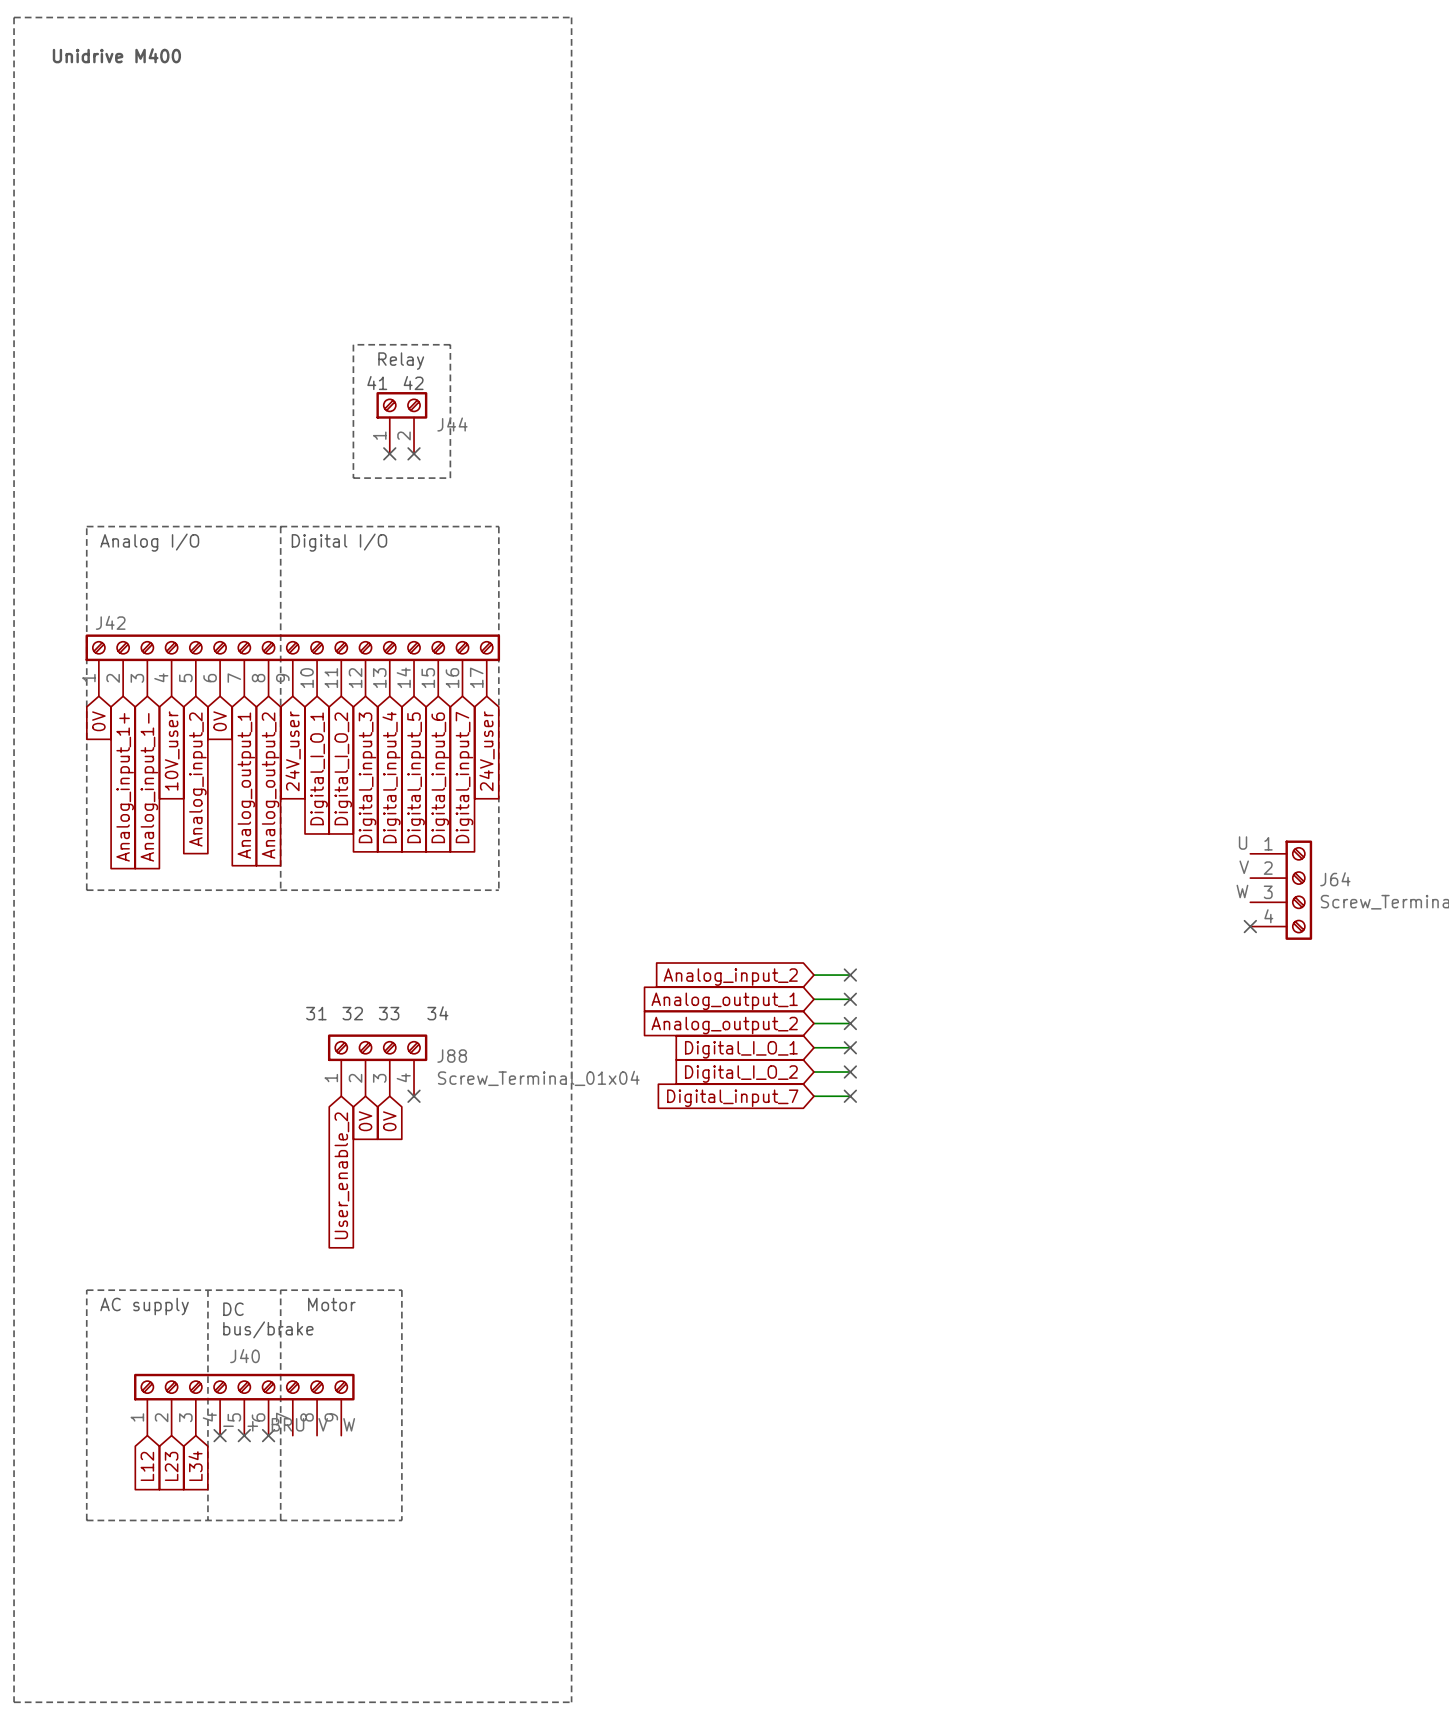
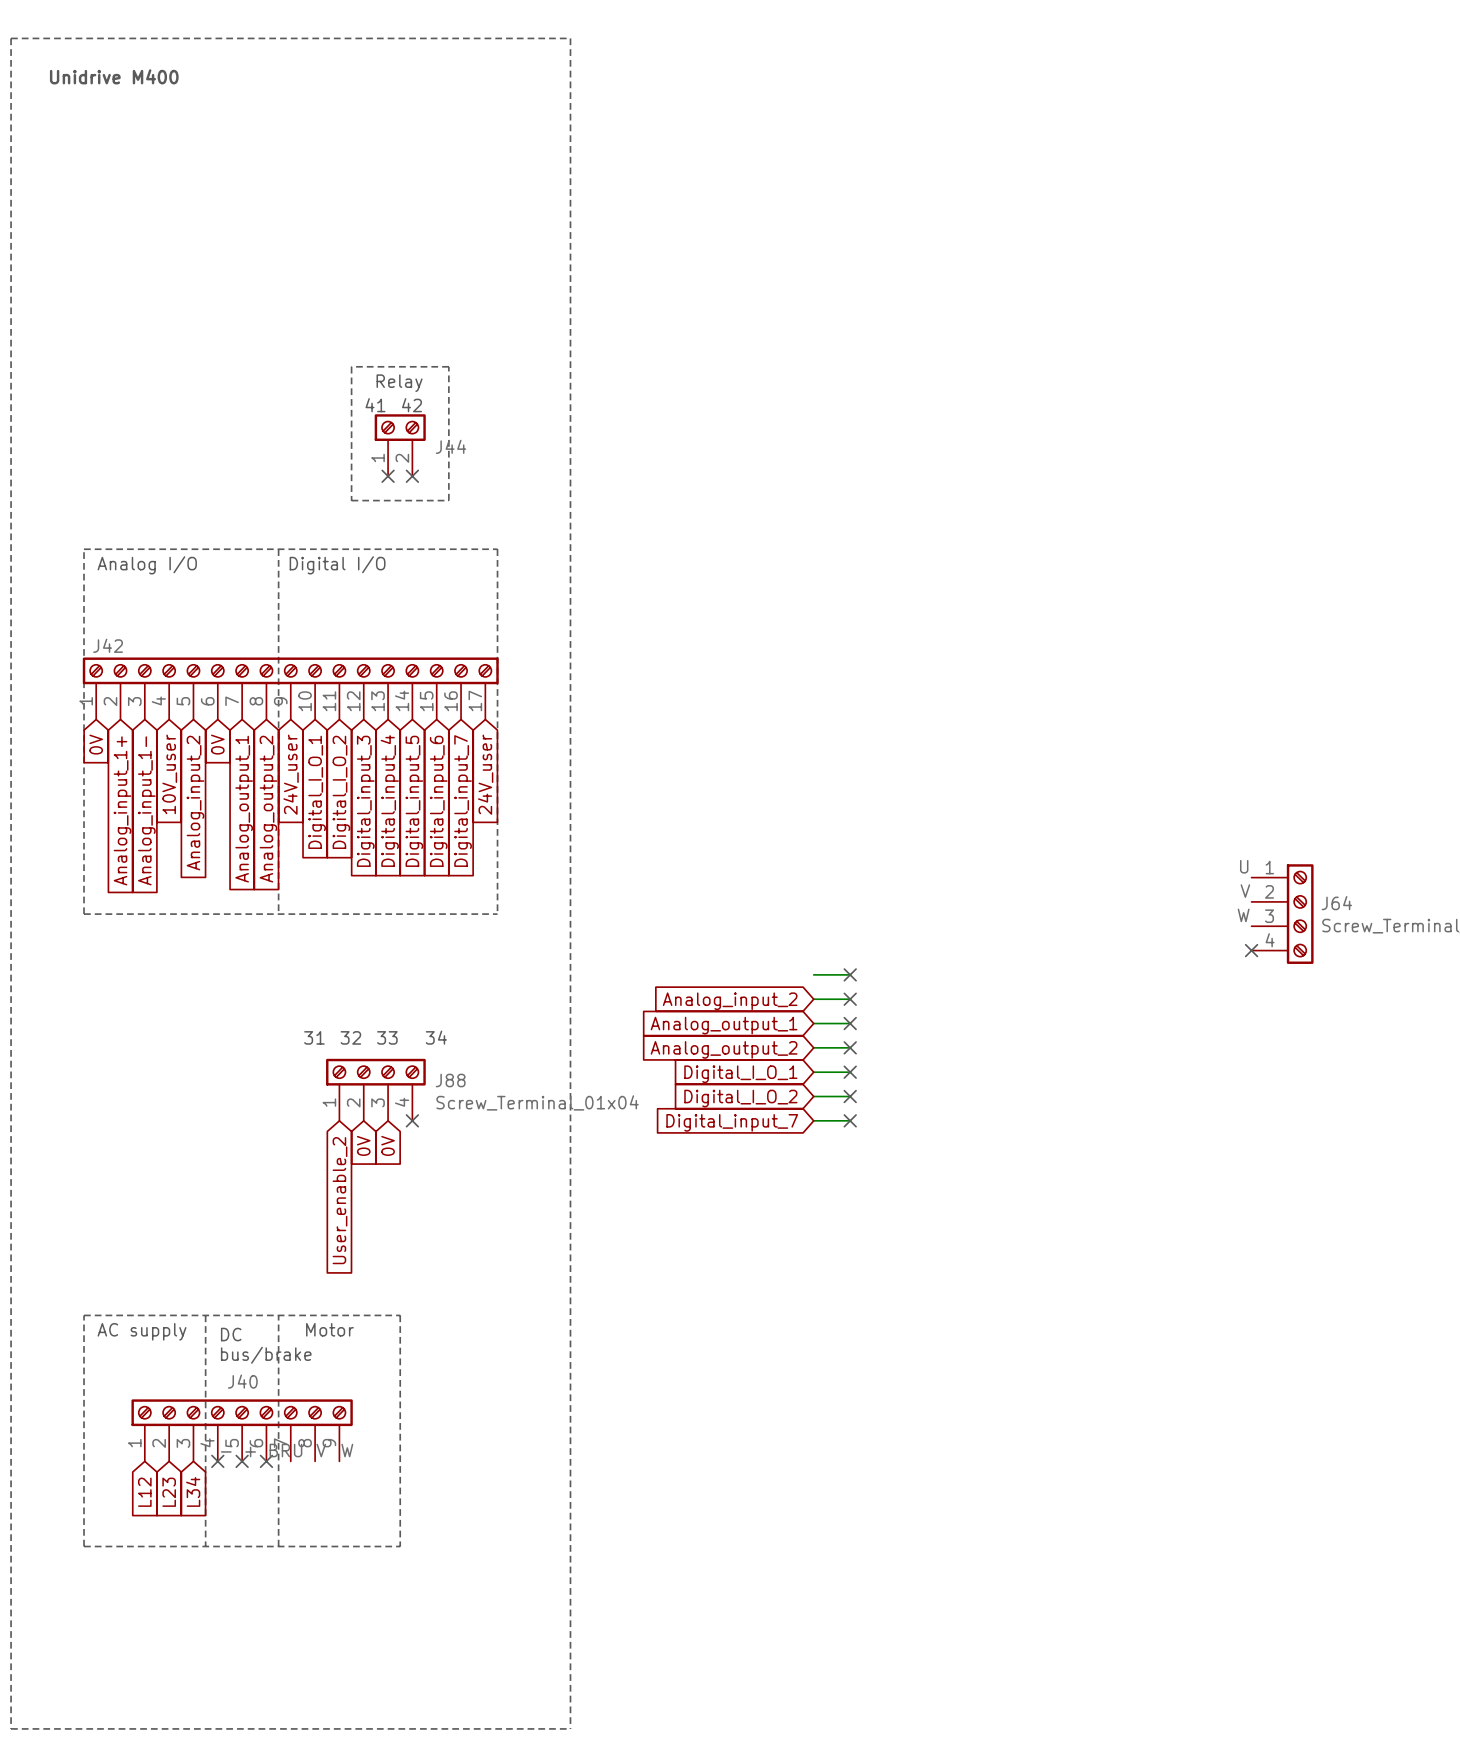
wire: none -> (813, 974) (850, 974)
no-connect mark: none -> (850, 974)

